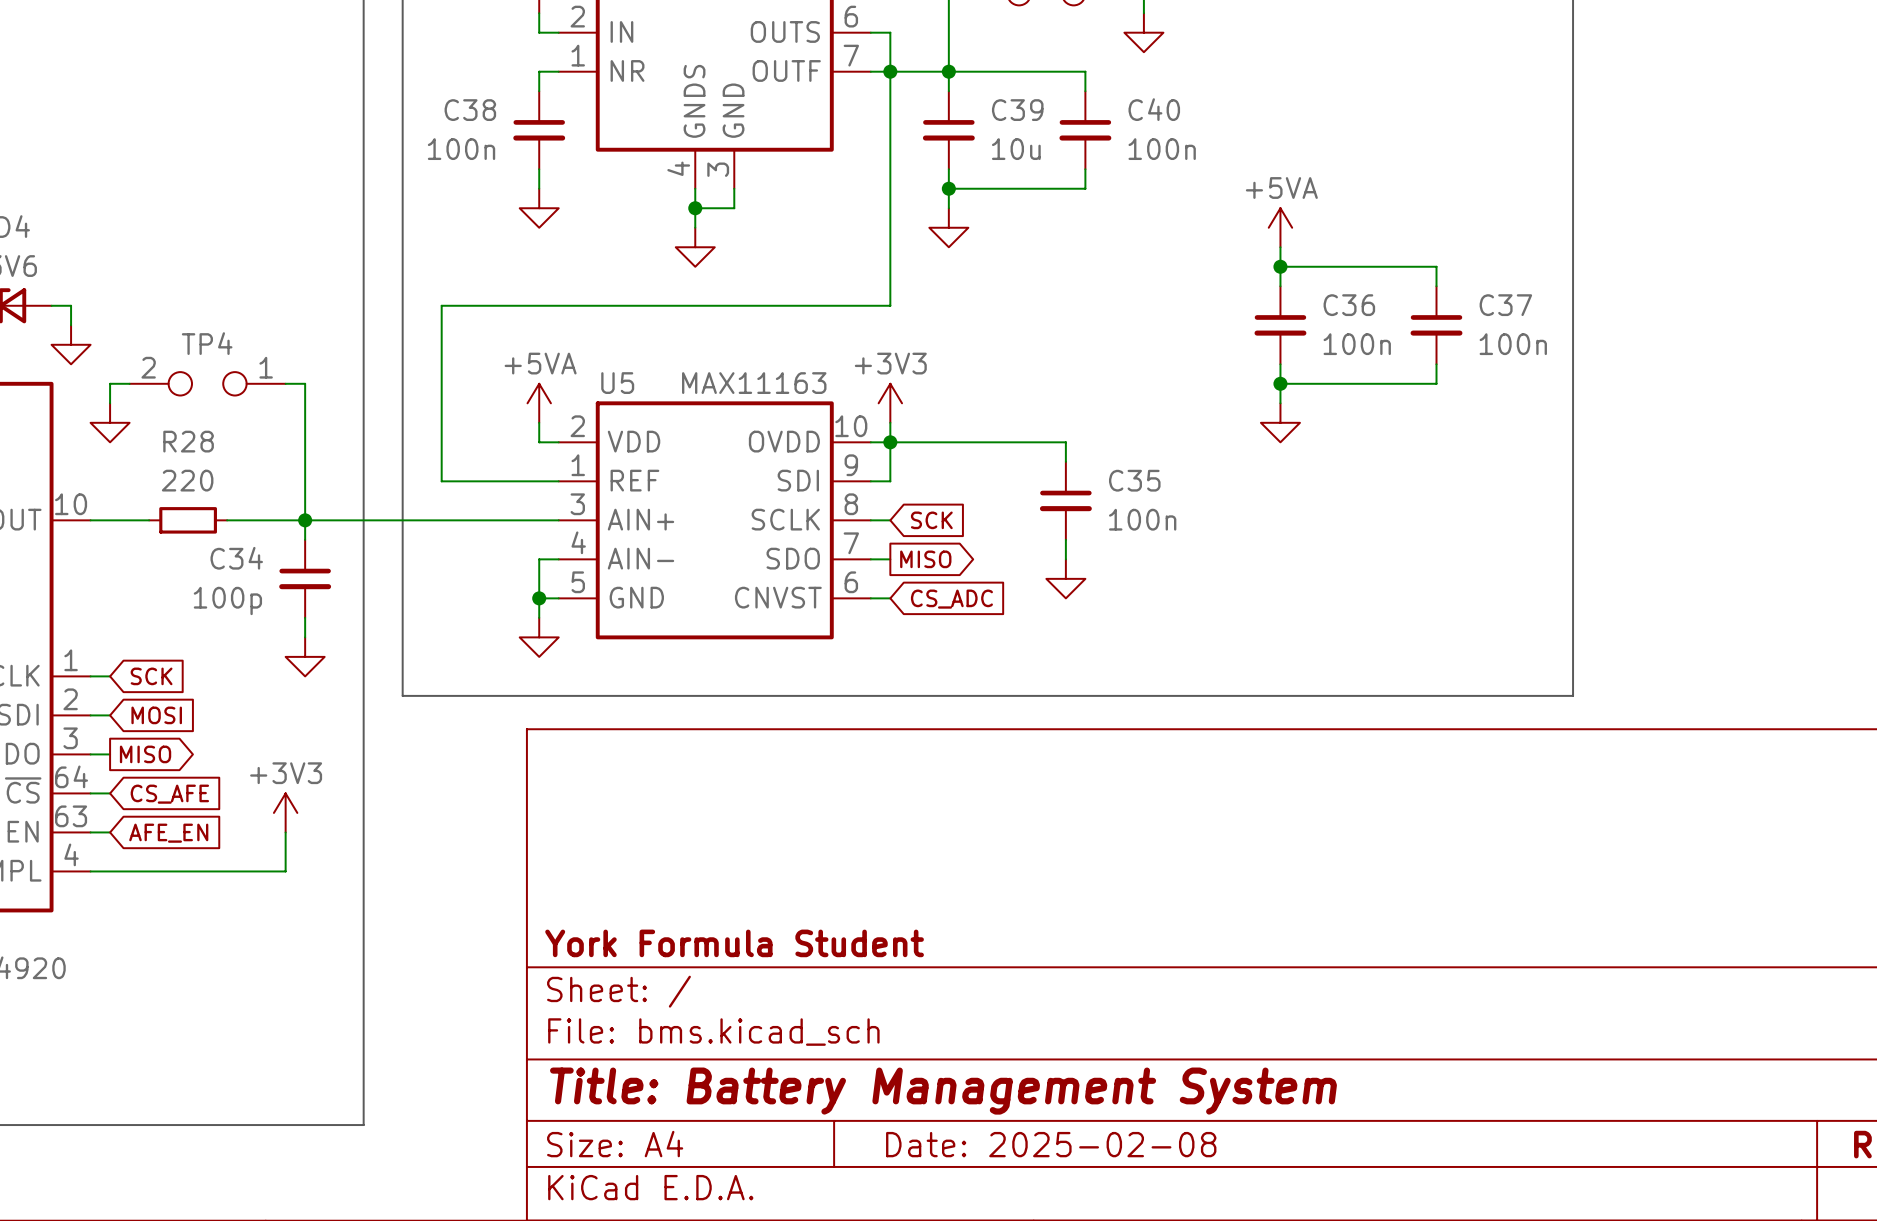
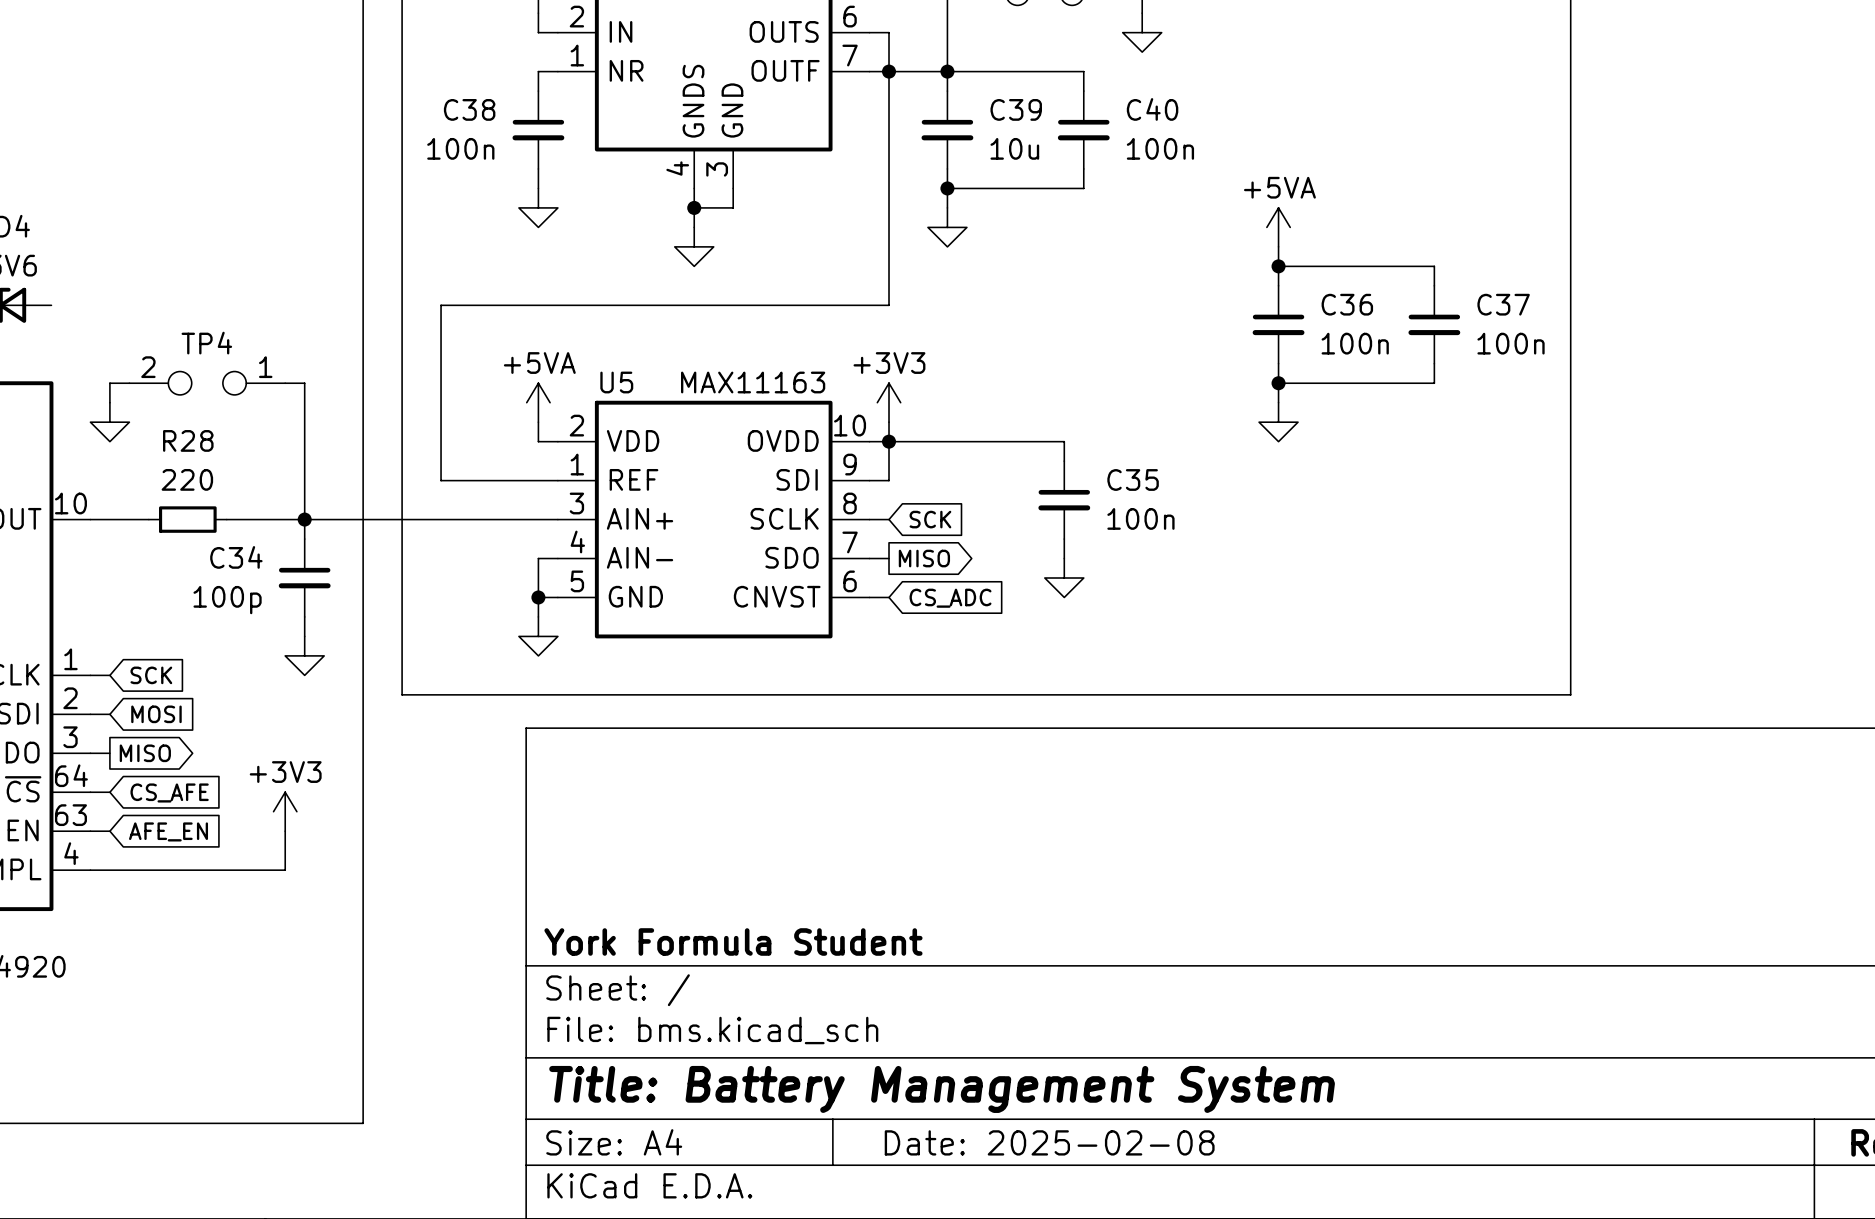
wire: (51, 305) (71, 305) (71, 325) -> none
power symbol: (71, 344) -> none

